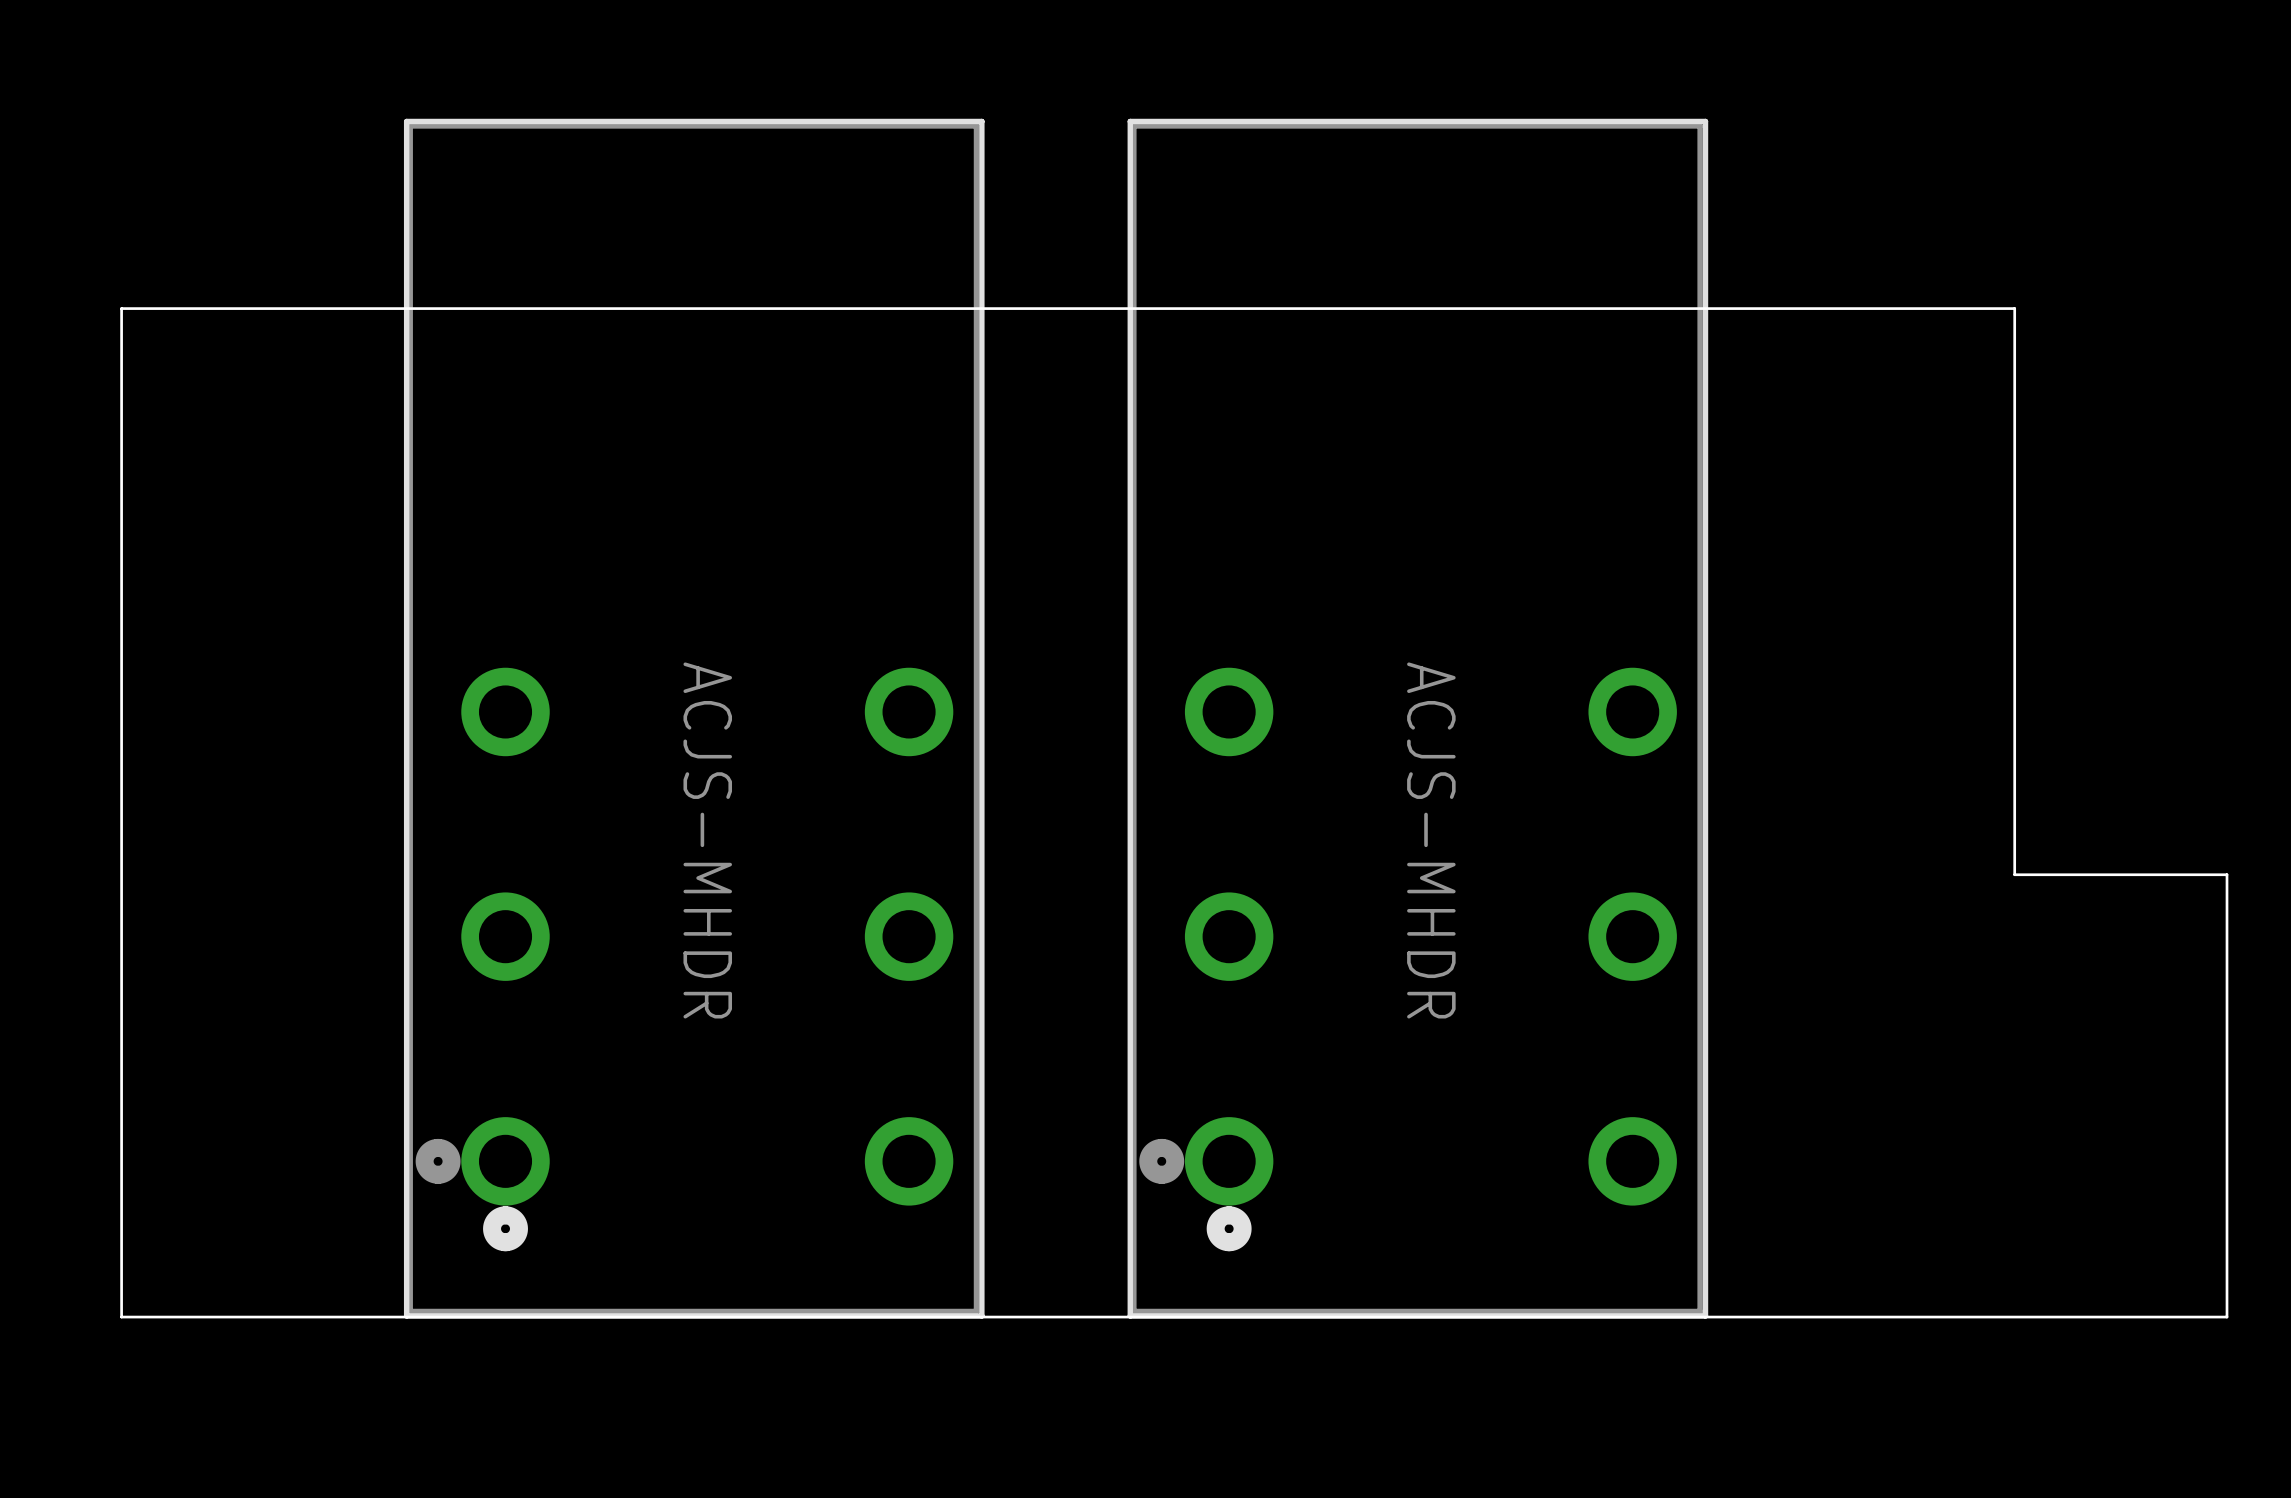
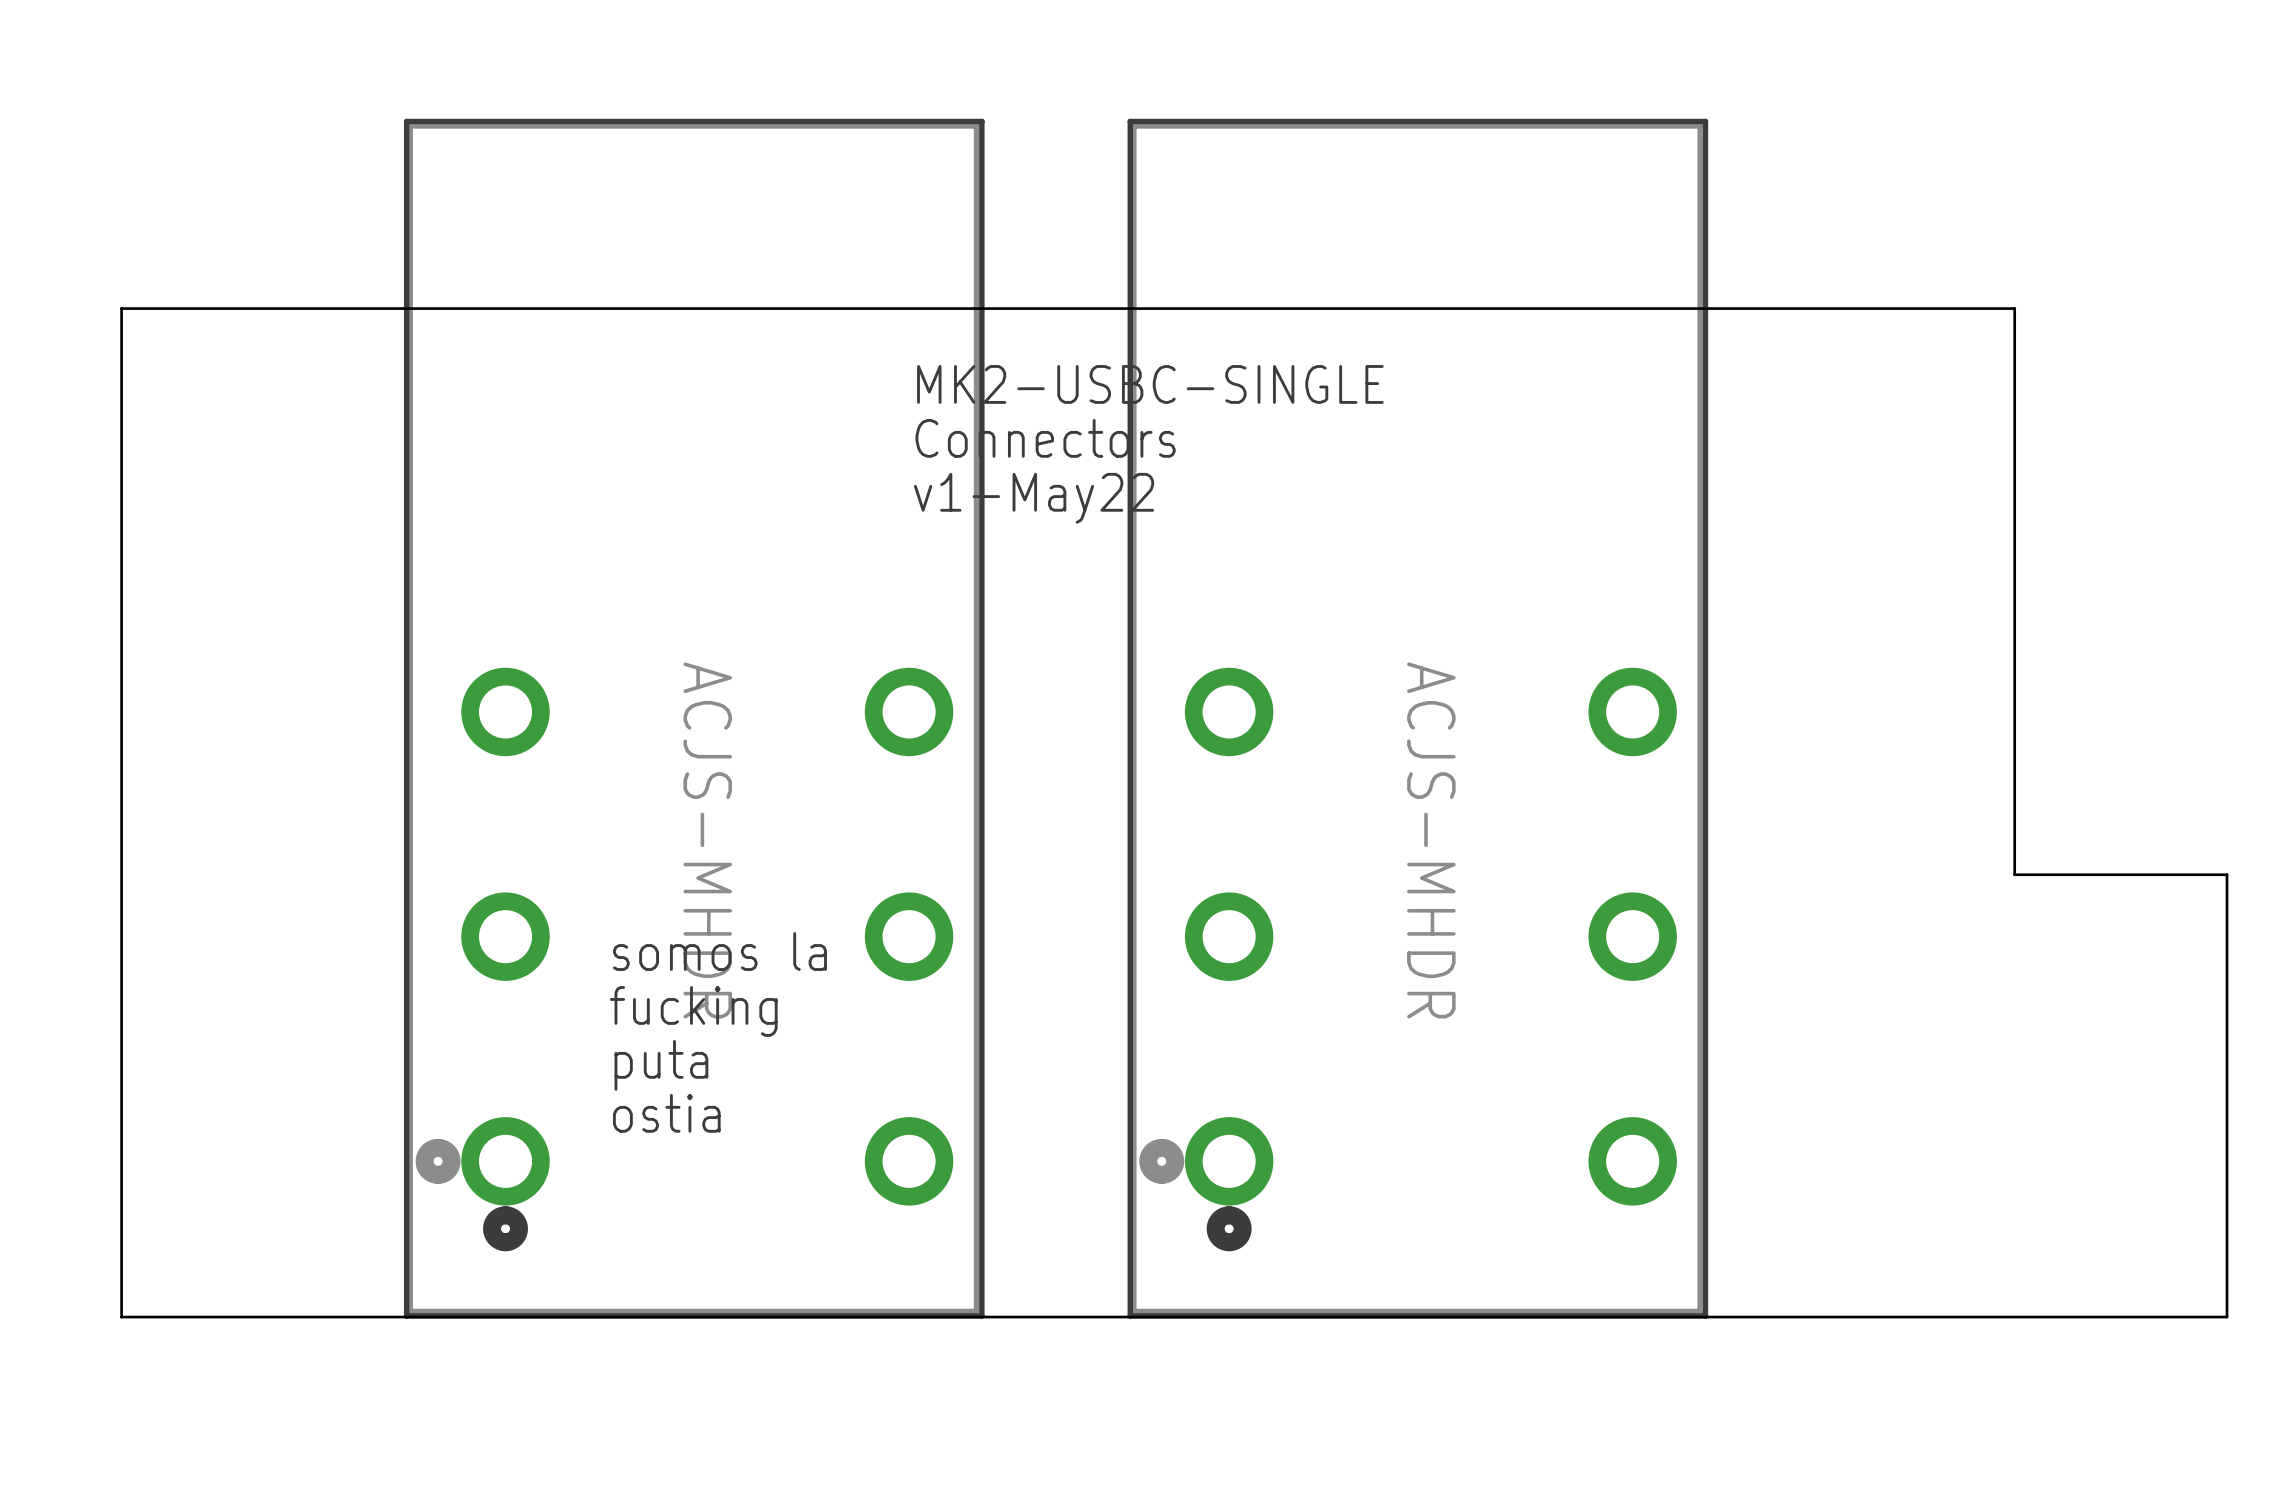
text: none -> MK2-USBC-SINGLE (1150, 384)
text: none -> Connectors (1045, 438)
text: none -> v1-May22 (1034, 498)
text: none -> somos la (719, 951)
text: none -> fucking (693, 1011)
text: none -> puta (661, 1065)
text: none -> ostia (666, 1113)

